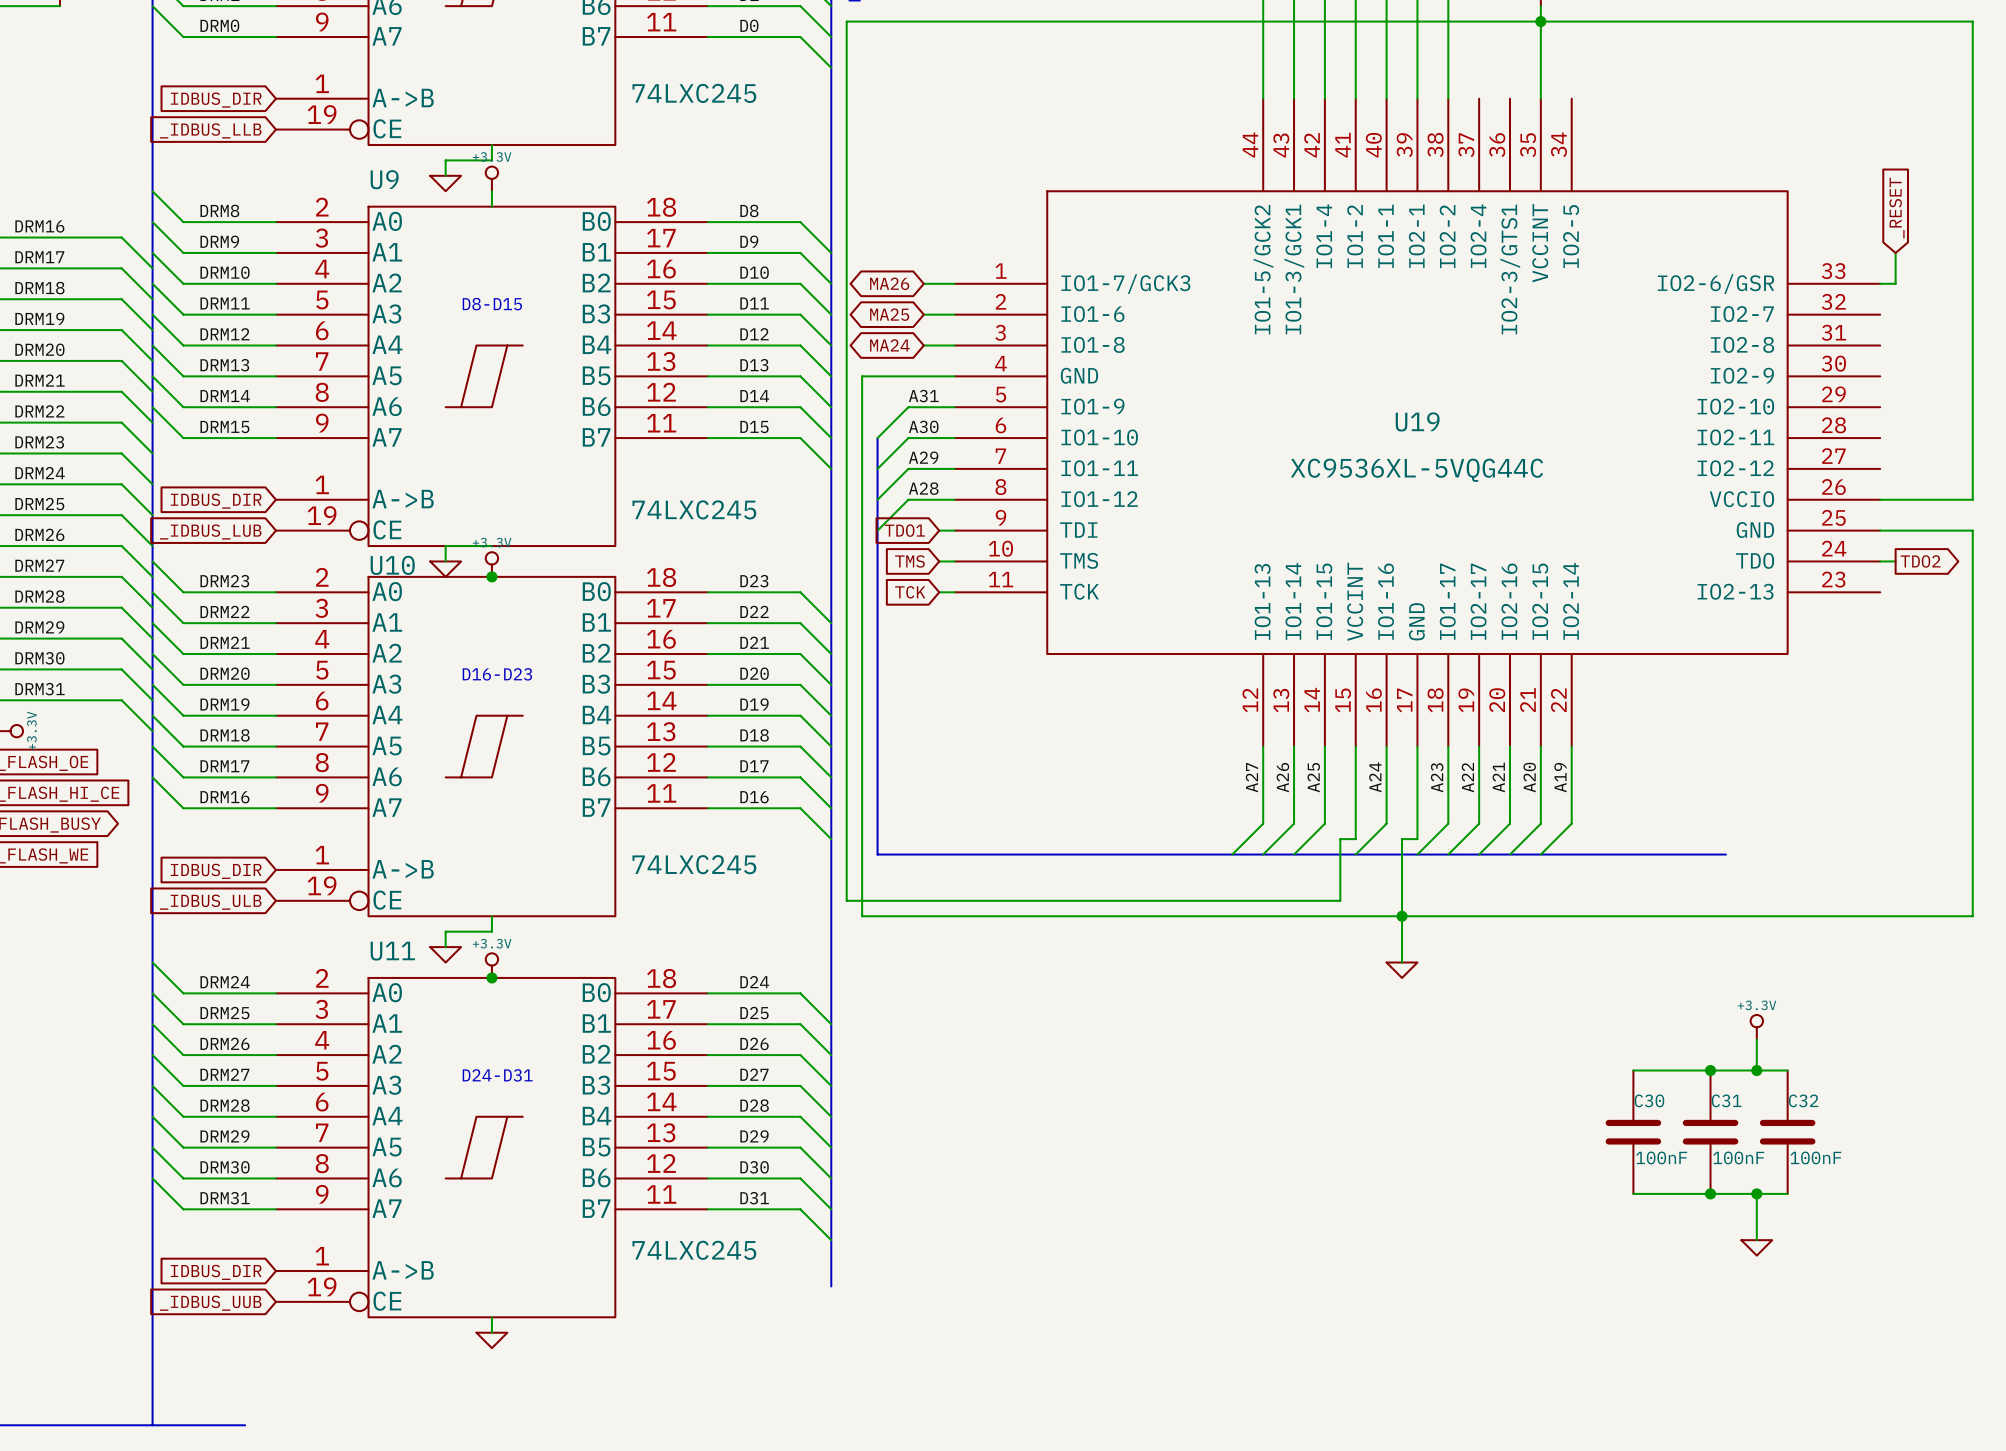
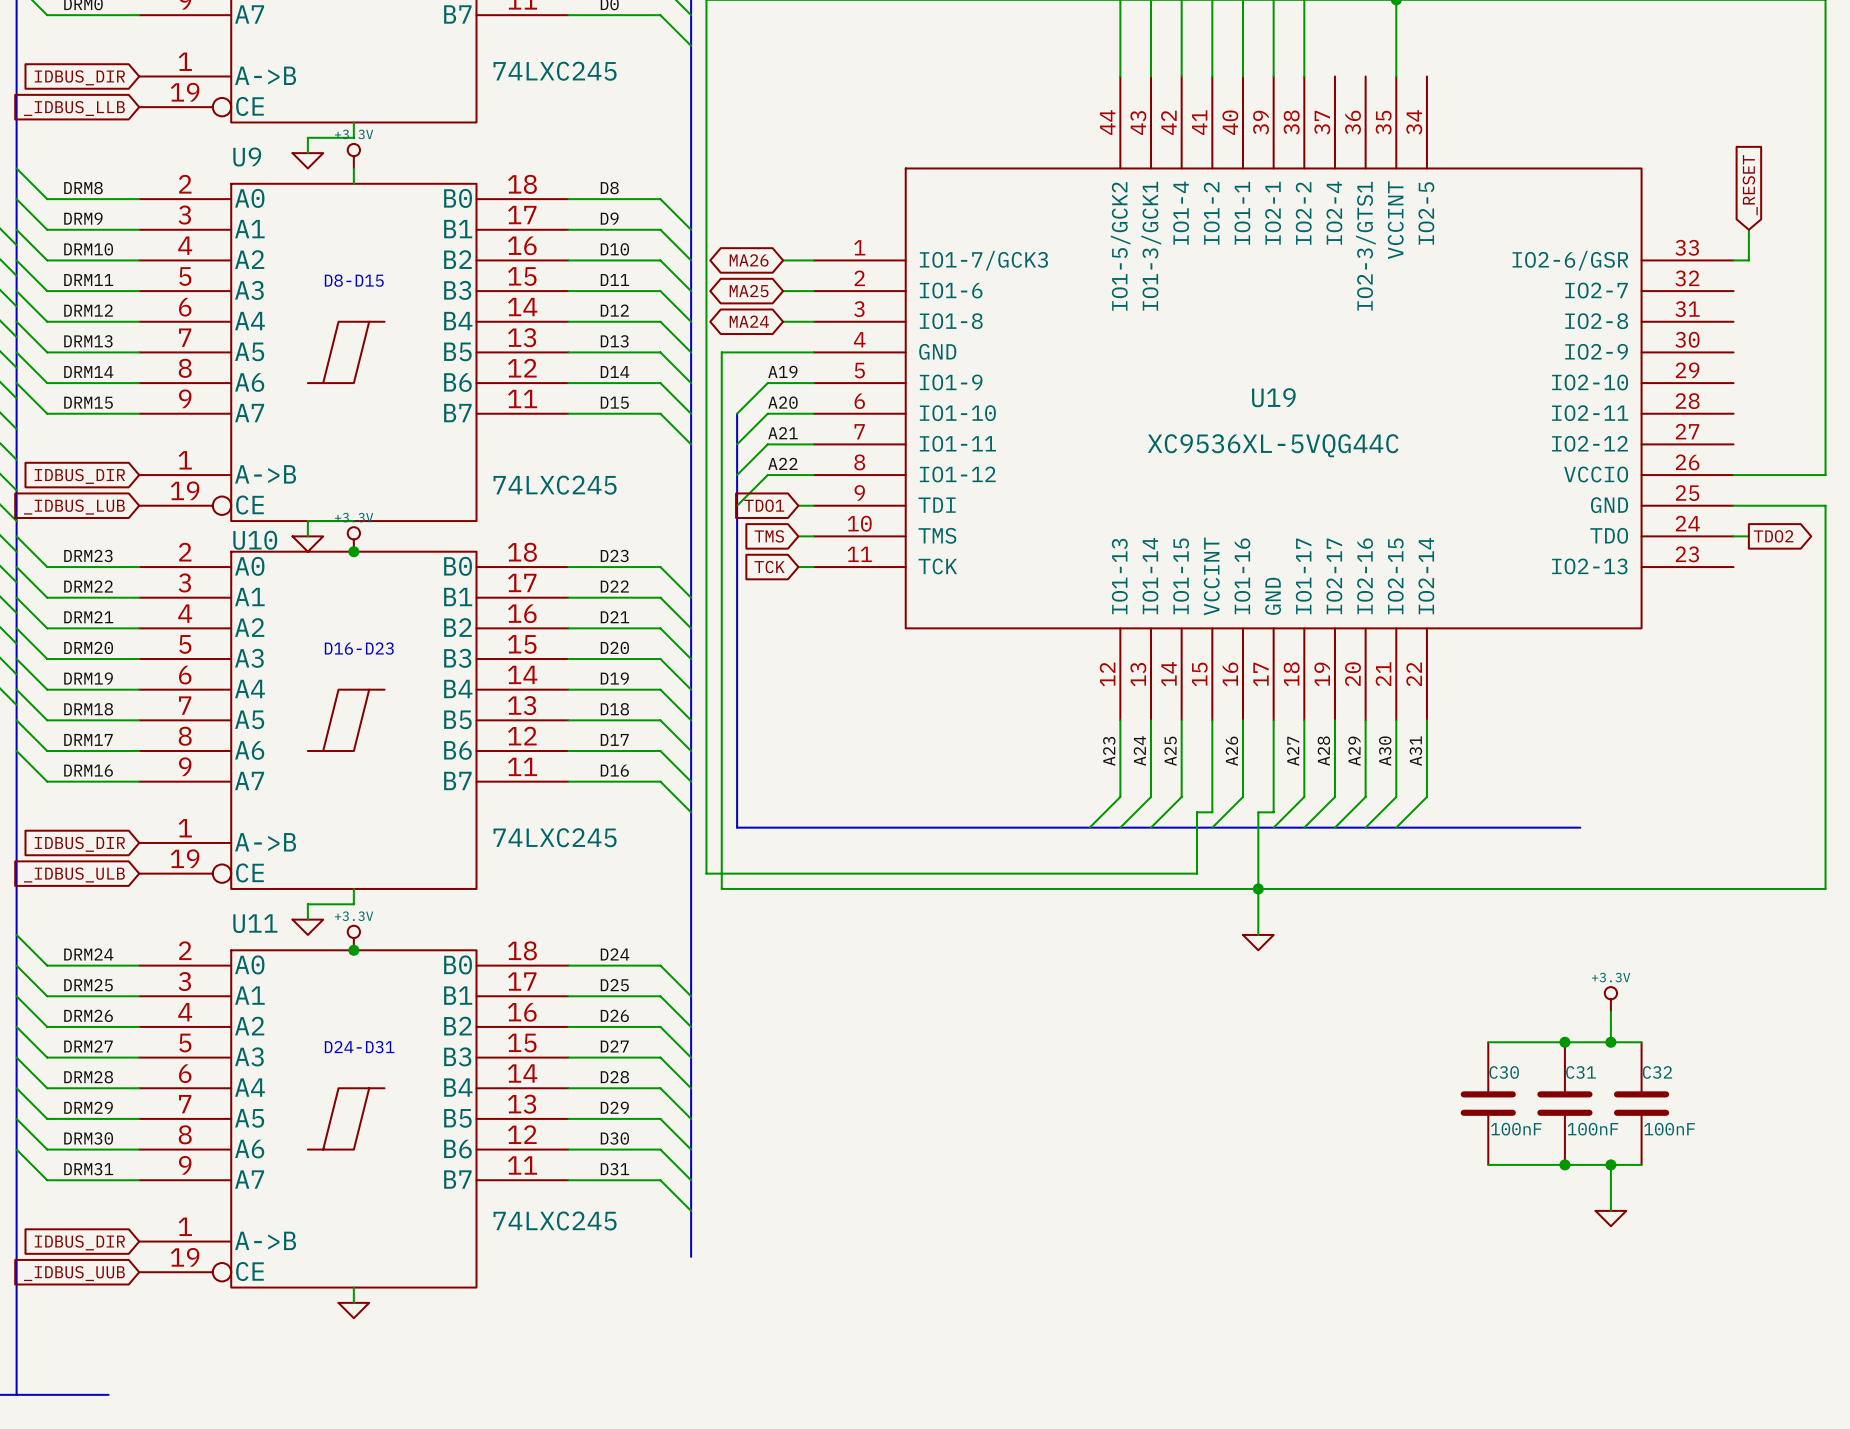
label: A31 (923, 396) -> A19 (782, 371)
label: A30 (923, 426) -> A20 (782, 402)
label: A29 (923, 457) -> A21 (783, 433)
label: A28 (923, 488) -> A22 (782, 463)
label: A27 (1251, 777) -> A23 (1109, 751)
label: A26 (1282, 777) -> A24 (1139, 750)
label: A24 (1375, 777) -> A26 (1231, 751)
label: A23 (1437, 777) -> A27 (1293, 751)
label: A22 (1467, 777) -> A28 (1323, 751)
label: A21 (1498, 777) -> A29 (1354, 751)
label: A20 (1529, 777) -> A30 (1385, 751)
label: A19 (1560, 777) -> A31 (1415, 751)

